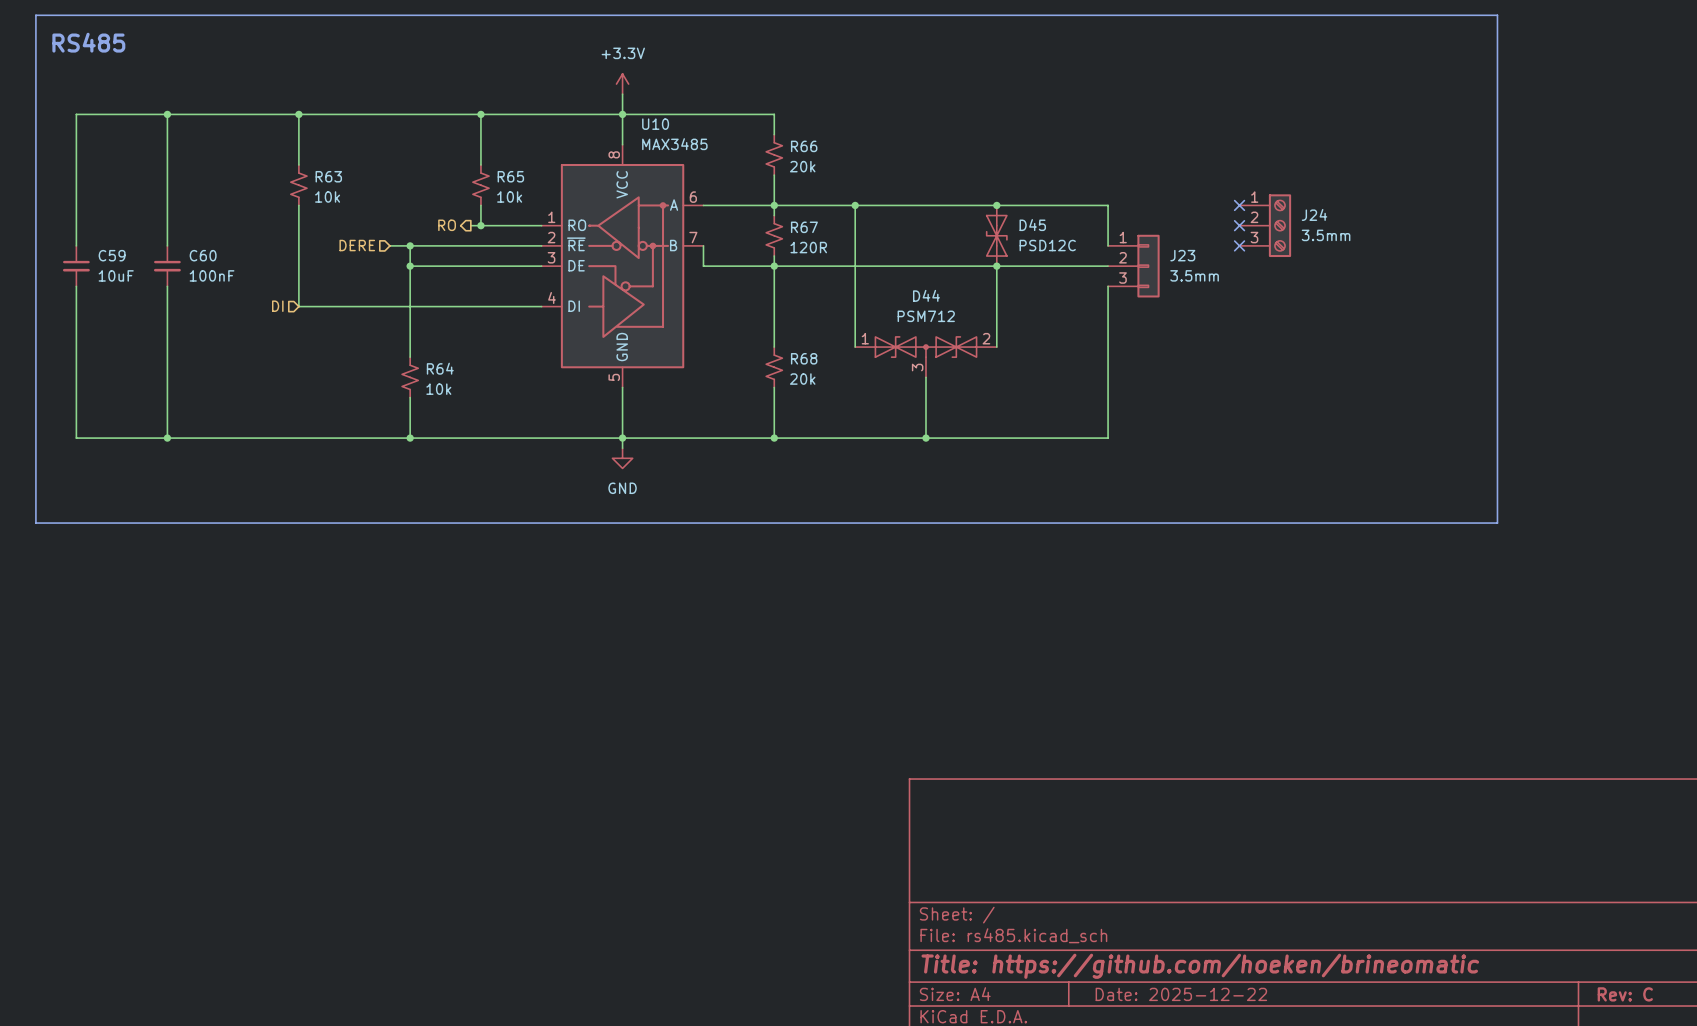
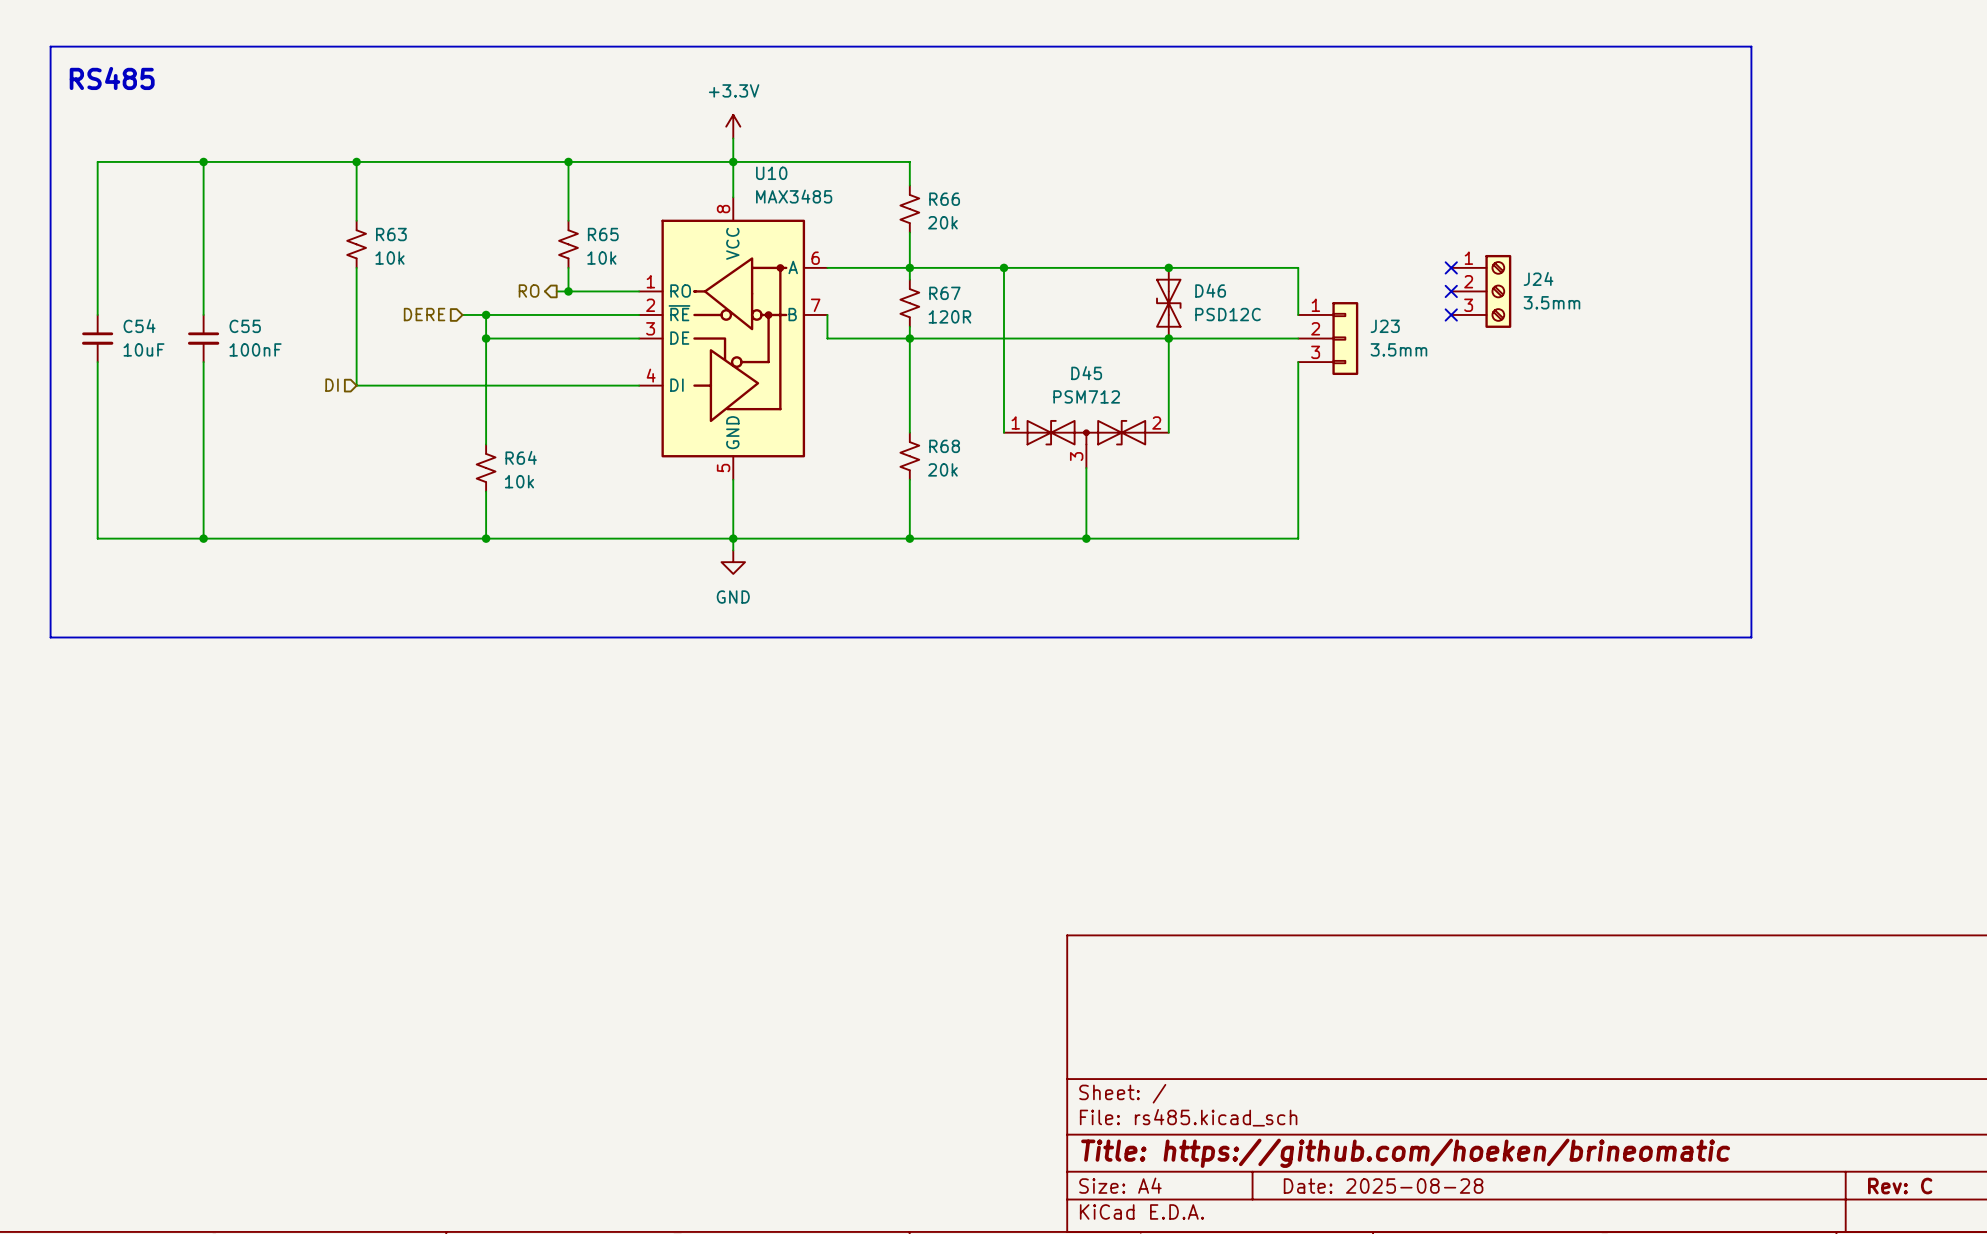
D45 name: D45 (1032, 225) -> D46 (1210, 290)
C59 name: C59 (112, 255) -> C54 (139, 326)
C60 name: C60 (203, 255) -> C55 (245, 326)
D44 name: D44 (926, 295) -> D45 (1086, 373)
title block: Date: 2025-12-22 (1181, 994) -> Date: 2025-08-28 (1383, 1186)

